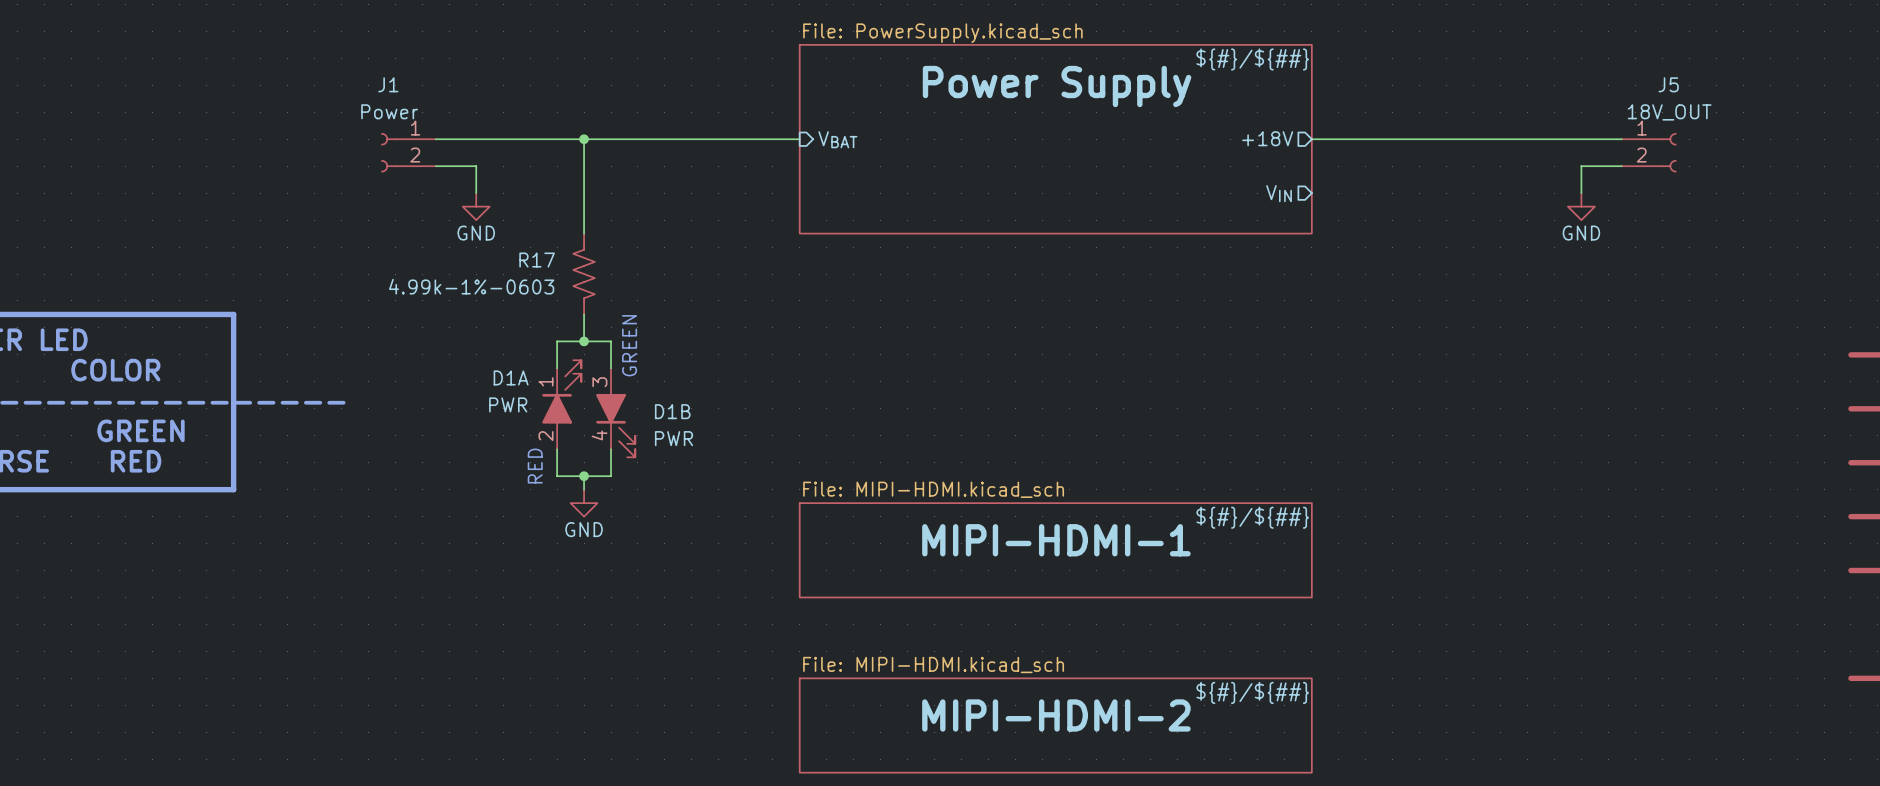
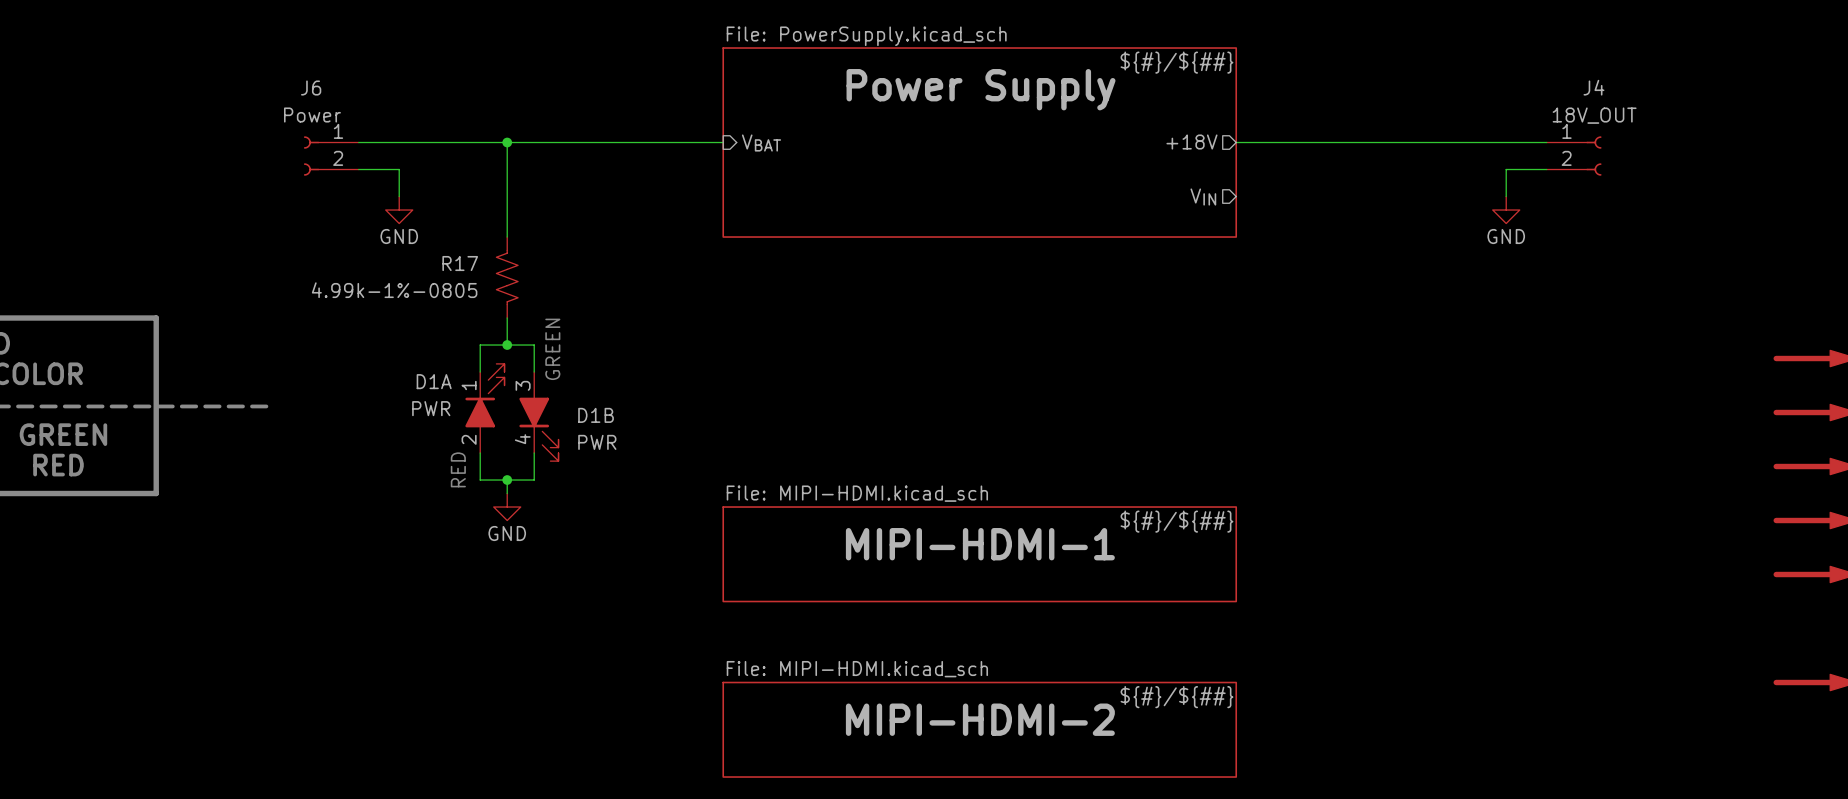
J1 name: J1 (388, 84) -> J6 (311, 88)
J5 name: J5 (1668, 84) -> J4 (1593, 87)
R17 value: 4.99k-1%-0603 (471, 286) -> 4.99k-1%-0805 (394, 290)

